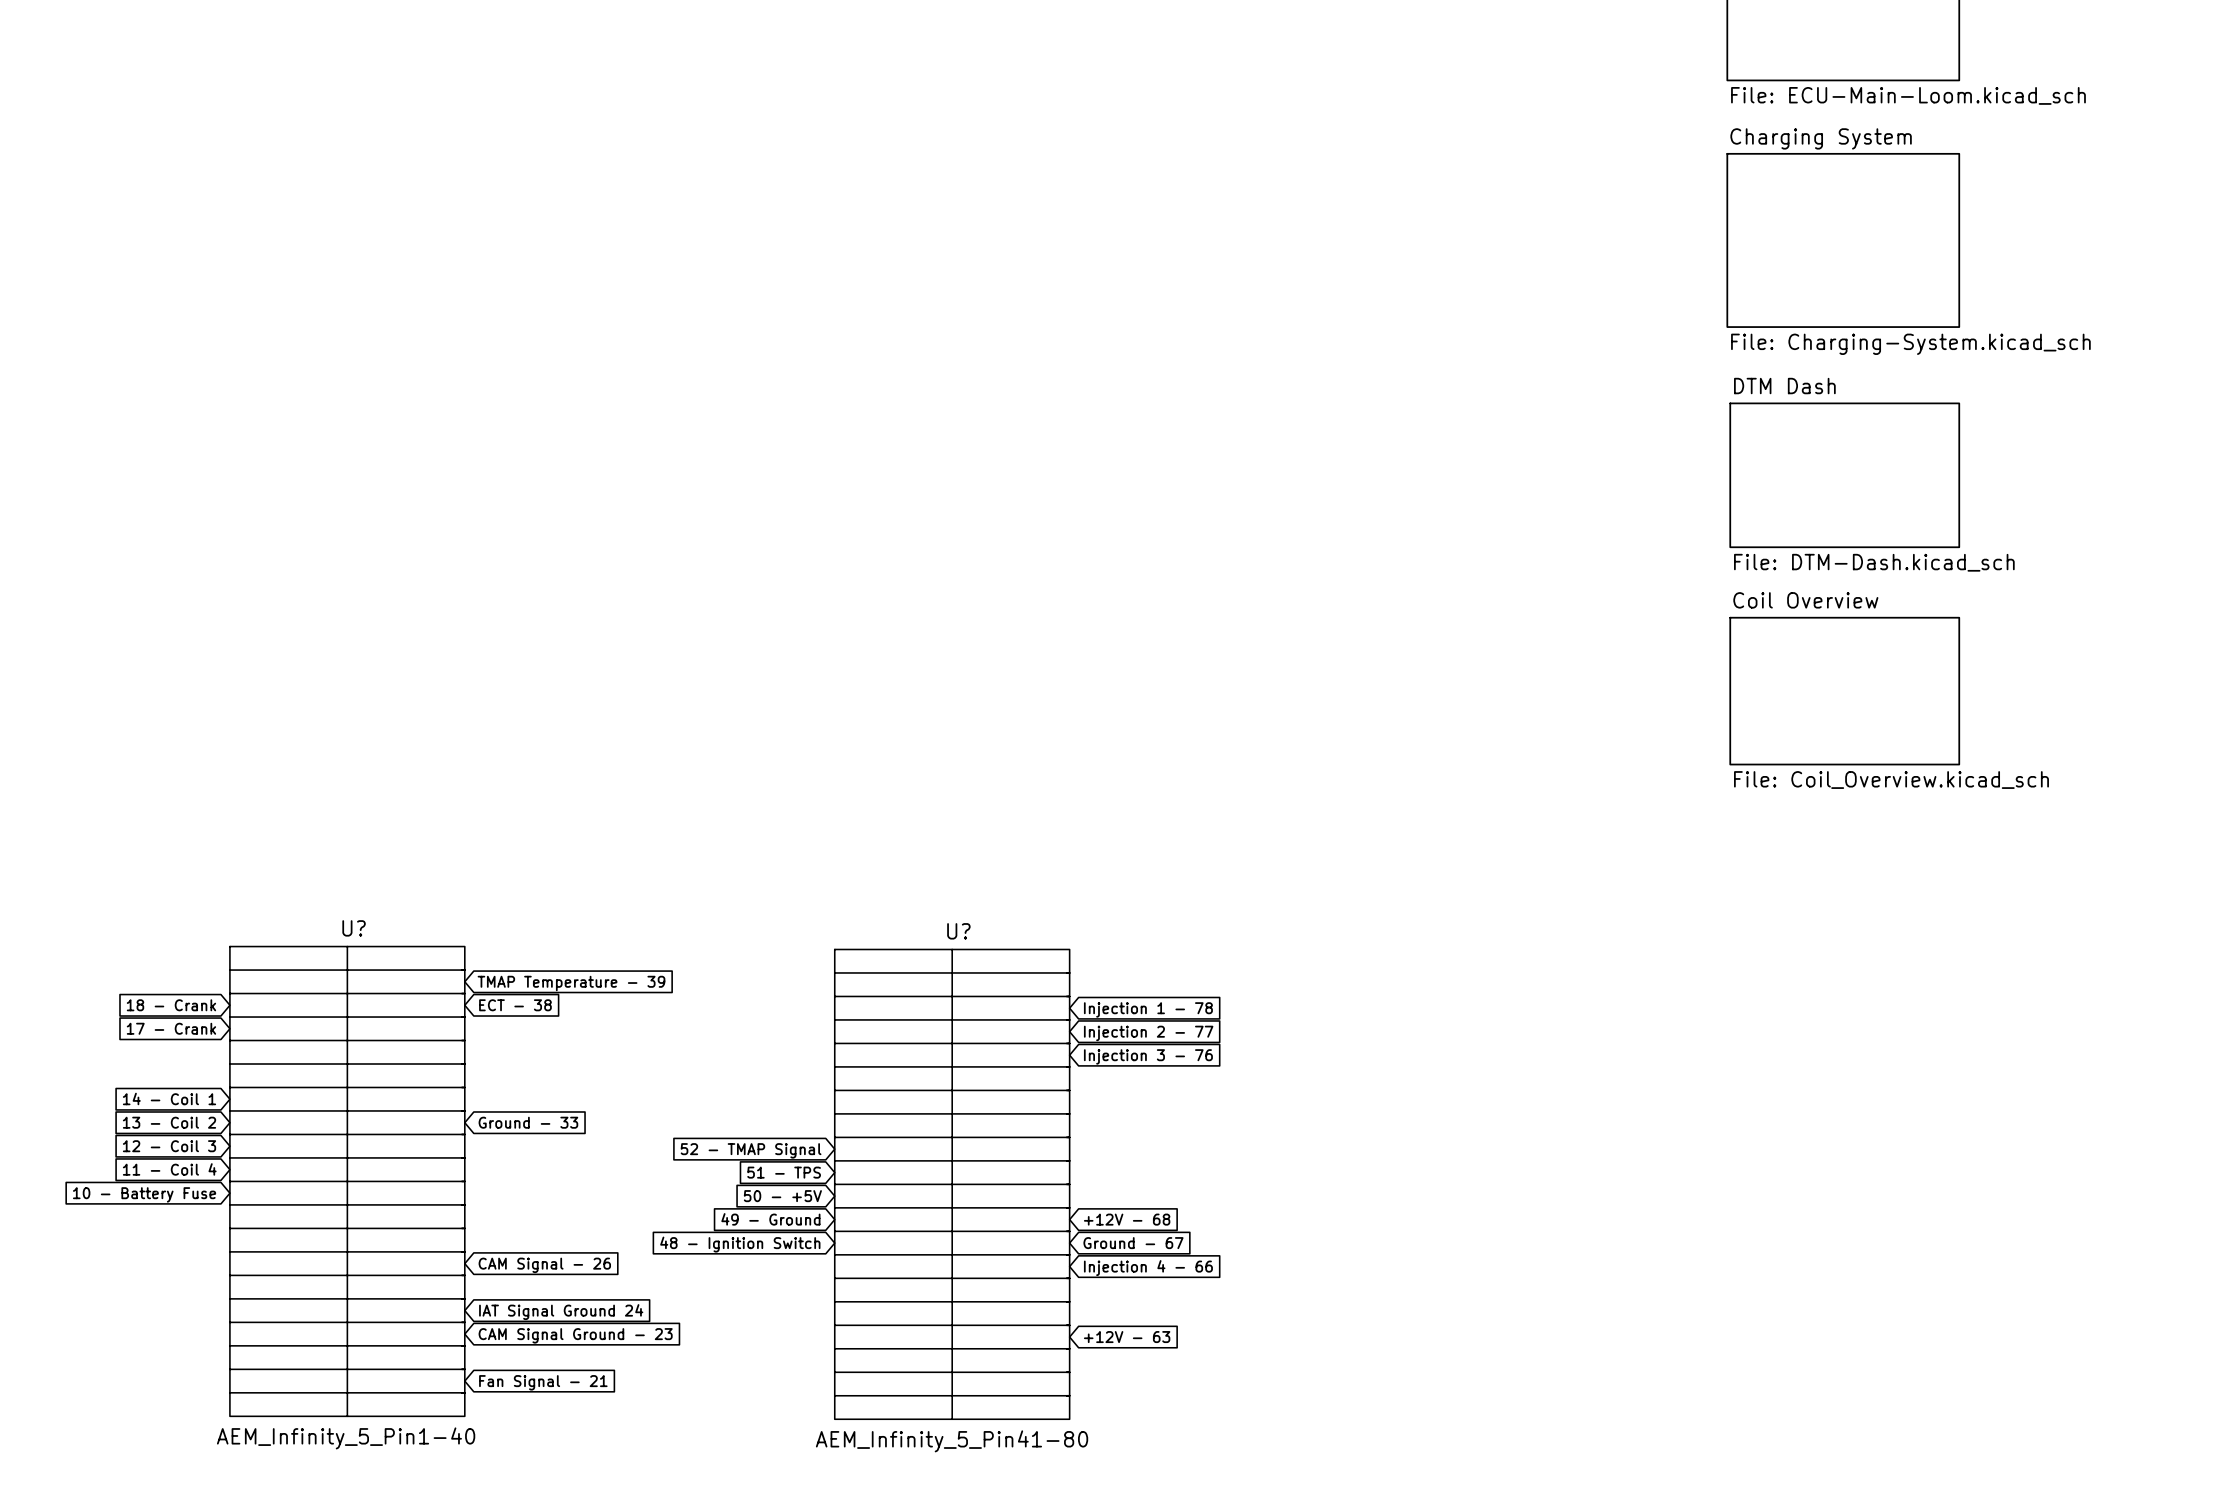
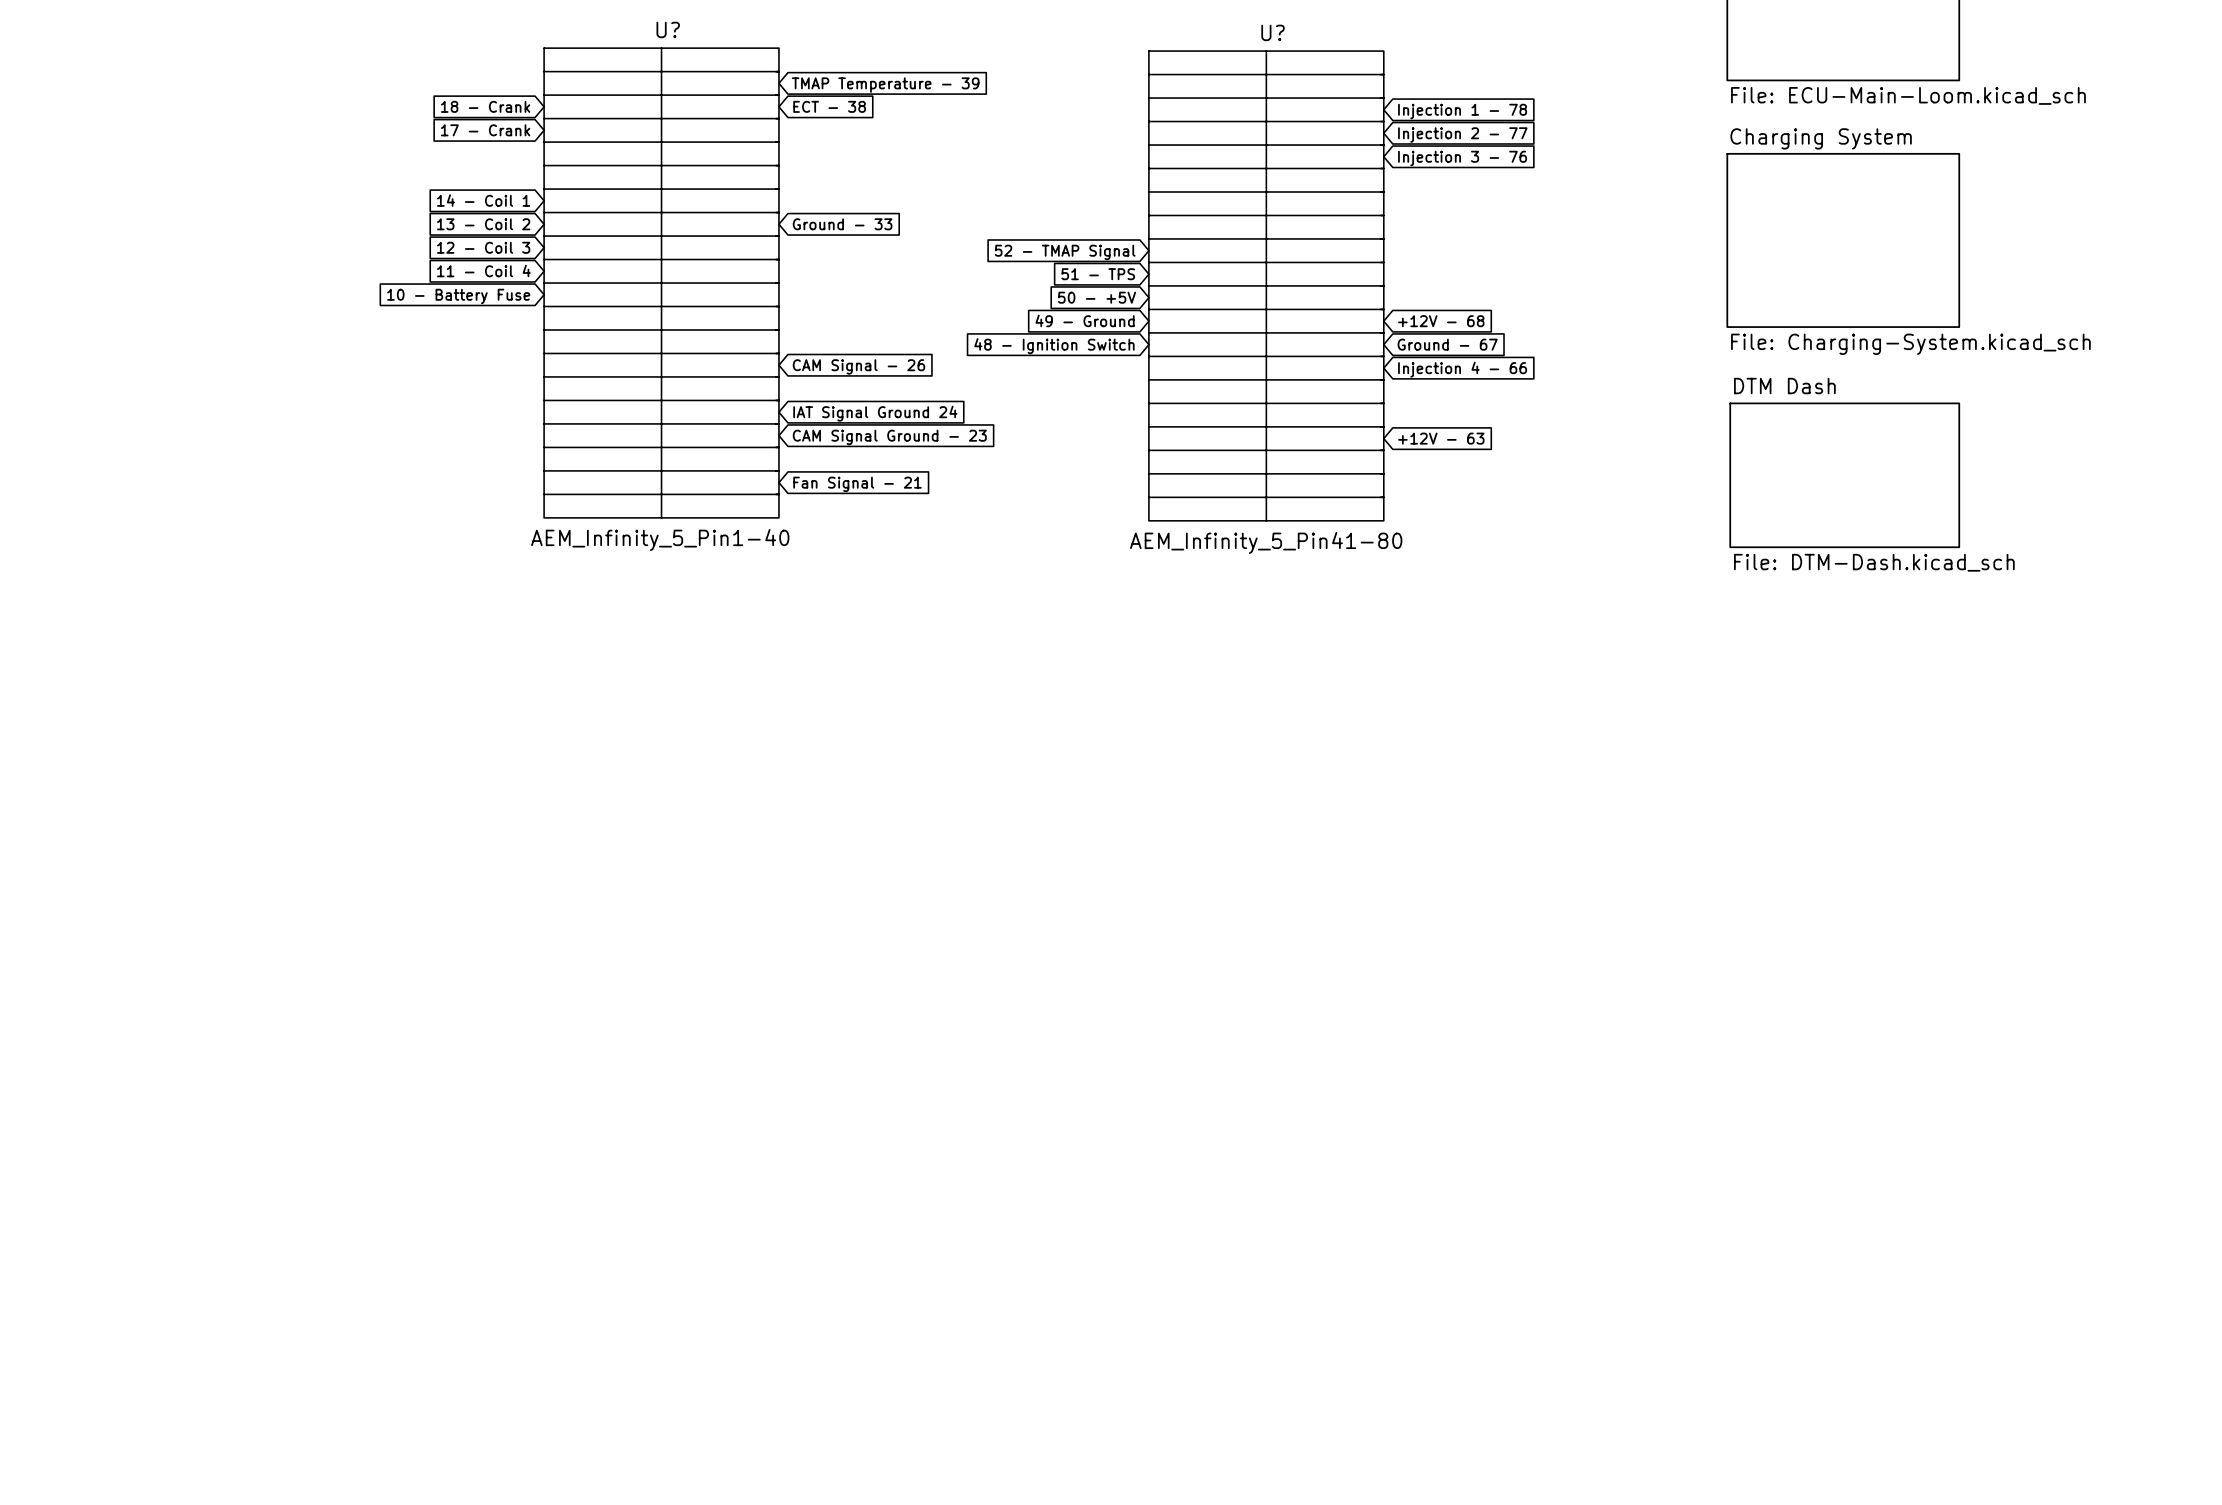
global label: none -> TMAP Temperature - 39 (885, 85)
global label: none -> 18 - Crank (485, 106)
global label: none -> ECT - 38 (829, 106)
global label: none -> Injection 1 - 78 (1462, 111)
global label: none -> 17 - Crank (485, 130)
global label: none -> Injection 2 - 77 (1462, 134)
global label: none -> Injection 3 - 76 (1462, 158)
global label: none -> 14 - Coil 1 (483, 200)
global label: none -> 13 - Coil 2 (483, 224)
global label: none -> Ground - 33 (842, 224)
global label: none -> 12 - Coil 3 (483, 247)
global label: none -> 52 - TMAP Signal (1065, 252)
global label: none -> 11 - Coil 4 (483, 271)
global label: none -> 51 - TPS (1098, 274)
U?: none -> AEM_Infinity_5_Pin1-40 (661, 283)
U?: none -> AEM_Infinity_5_Pin41-80 (1266, 285)
global label: none -> 10 - Battery Fuse (458, 296)
global label: none -> 50 - +5V (1097, 297)
global label: none -> 49 - Ground (1085, 320)
global label: none -> +12V - 68 (1441, 321)
global label: none -> Ground - 67 (1447, 344)
global label: none -> 48 - Ignition Switch (1054, 346)
global label: none -> CAM Signal - 26 (858, 366)
global label: none -> Injection 4 - 66 (1462, 369)
global label: none -> IAT Signal Ground 24 (875, 413)
global label: none -> CAM Signal Ground - 23 (889, 437)
global label: none -> +12V - 63 (1441, 438)
global label: none -> Fan Signal - 21 (857, 484)
sheet Coil Overview: File: Coil_Overview.kicad_sch (1844, 691) -> none
global label: TMAP Temperature - 39 (571, 983) -> none
global label: 18 - Crank (171, 1005) -> none
global label: ECT - 38 (515, 1005) -> none
global label: Injection 1 - 78 (1148, 1009) -> none
global label: 17 - Crank (171, 1028) -> none
global label: Injection 2 - 77 (1148, 1033) -> none
global label: Injection 3 - 76 (1148, 1056) -> none
global label: 14 - Coil 1 (169, 1098) -> none
global label: 13 - Coil 2 (169, 1122) -> none
global label: Ground - 33 (528, 1122) -> none
global label: 12 - Coil 3 (169, 1146) -> none
global label: 52 - TMAP Signal (751, 1150) -> none
global label: 11 - Coil 4 (169, 1169) -> none
global label: 51 - TPS (784, 1172) -> none
U?: AEM_Infinity_5_Pin1-40 (347, 1181) -> none
U?: AEM_Infinity_5_Pin41-80 (952, 1184) -> none
global label: 10 - Battery Fuse (144, 1194) -> none
global label: 50 - +5V (782, 1196) -> none
global label: 49 - Ground (770, 1219) -> none
global label: +12V - 68 (1127, 1219) -> none
global label: Ground - 67 (1133, 1243) -> none
global label: 48 - Ignition Switch (740, 1244) -> none
global label: CAM Signal - 26 (544, 1265) -> none
global label: Injection 4 - 66 (1148, 1268) -> none
global label: IAT Signal Ground 24 (561, 1312) -> none
global label: CAM Signal Ground - 23 (575, 1335) -> none
global label: +12V - 63 (1127, 1337) -> none
global label: Fan Signal - 21 (543, 1382) -> none

